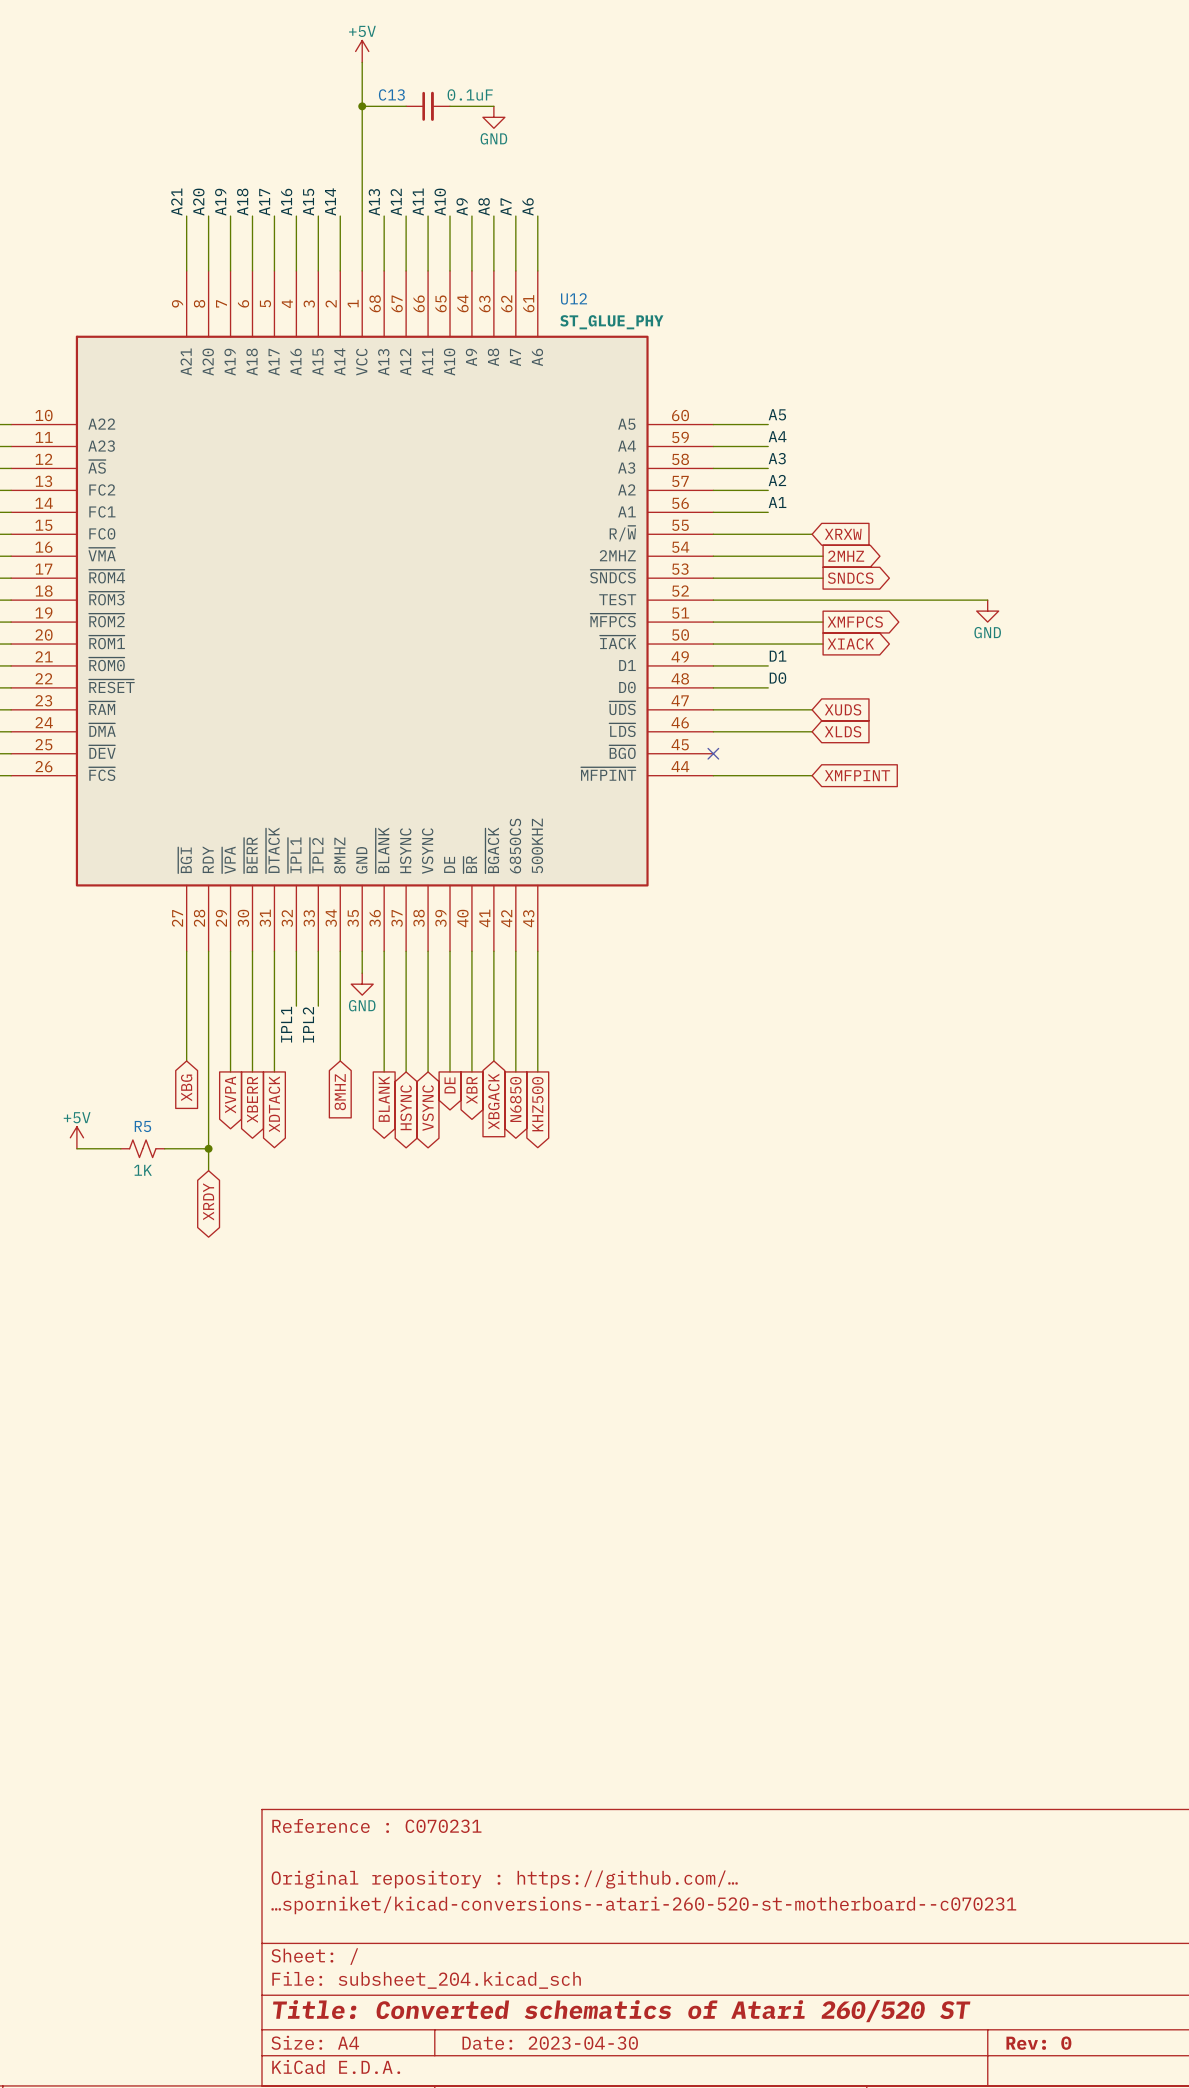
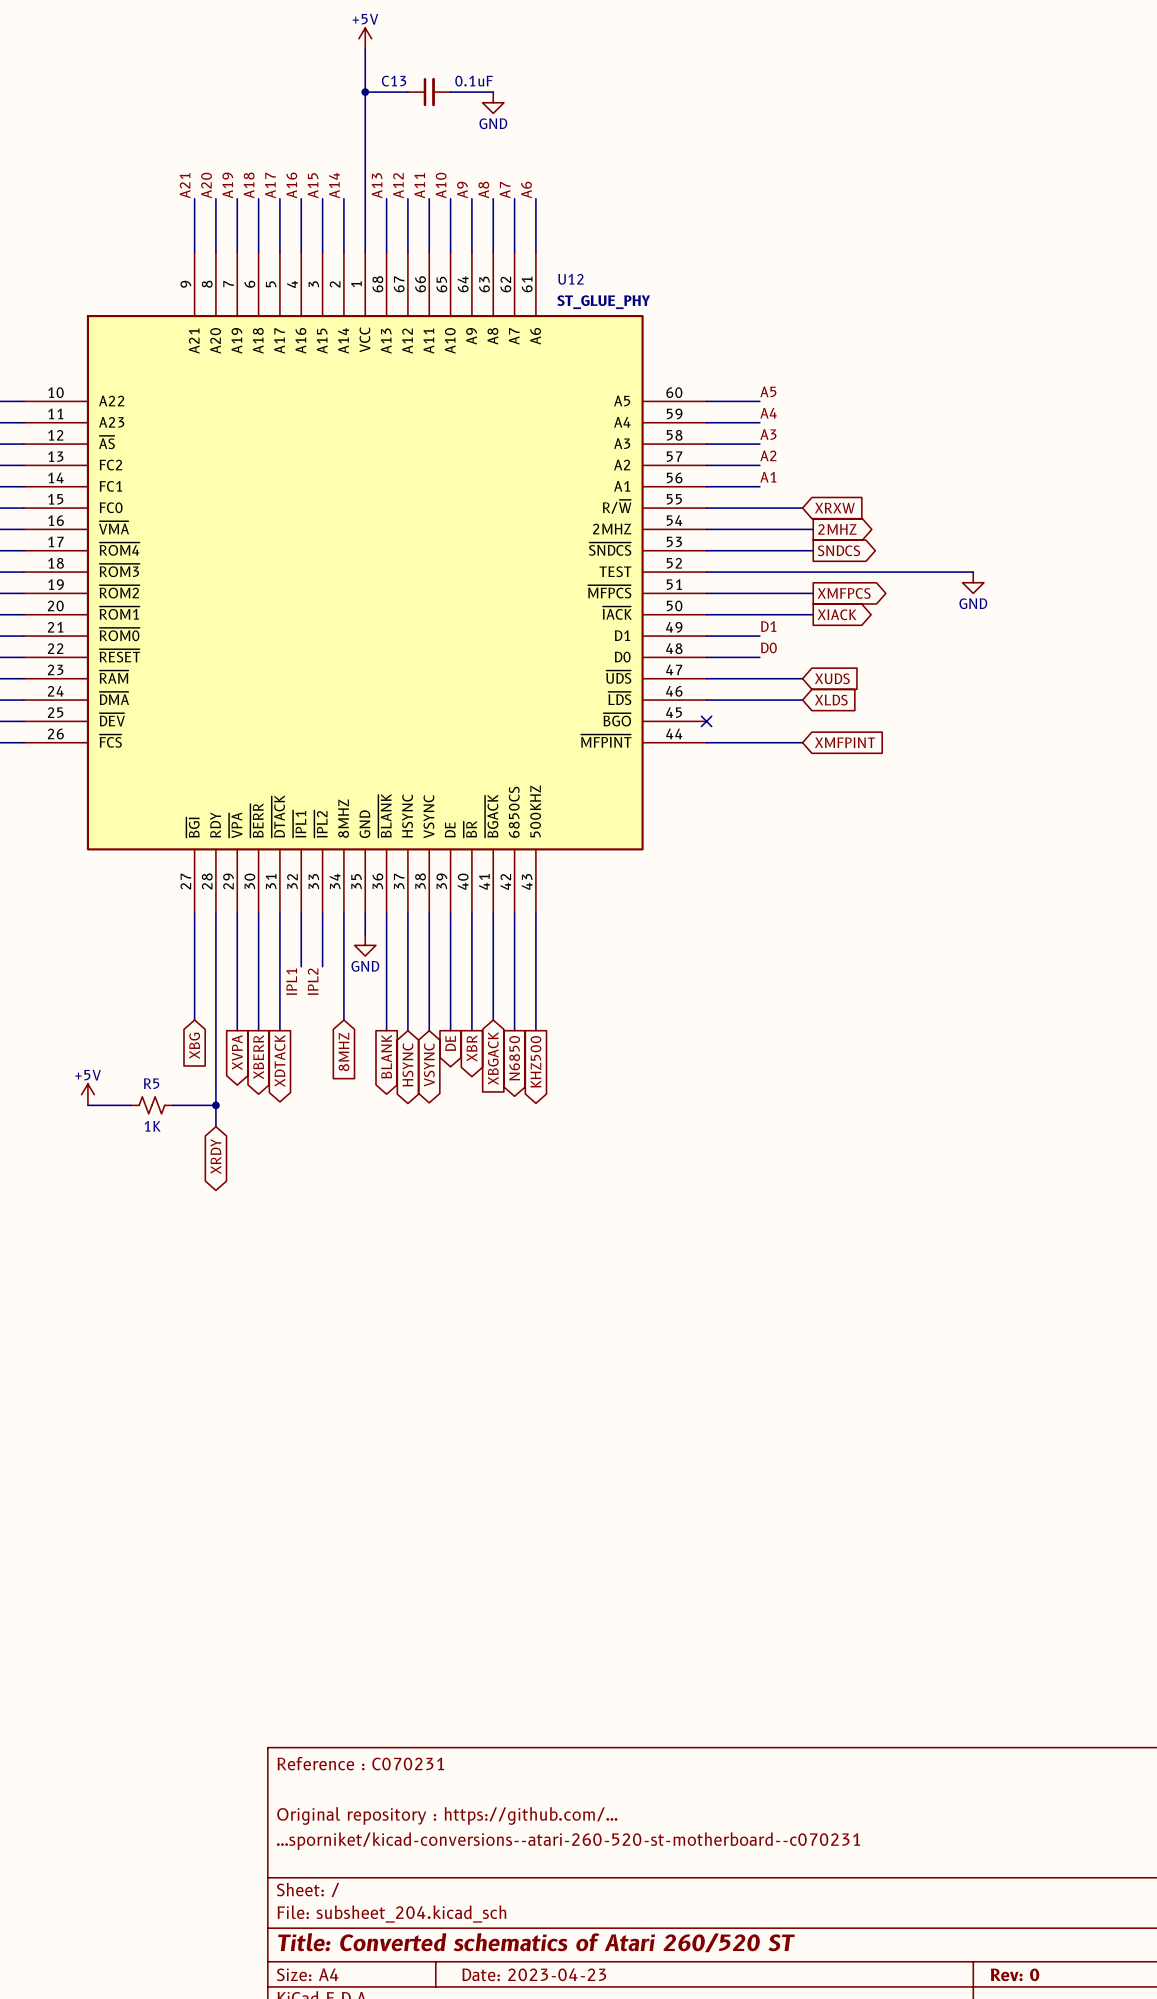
title block: Date: 2023-04-30 (550, 2043) -> Date: 2023-04-23 (534, 1974)

